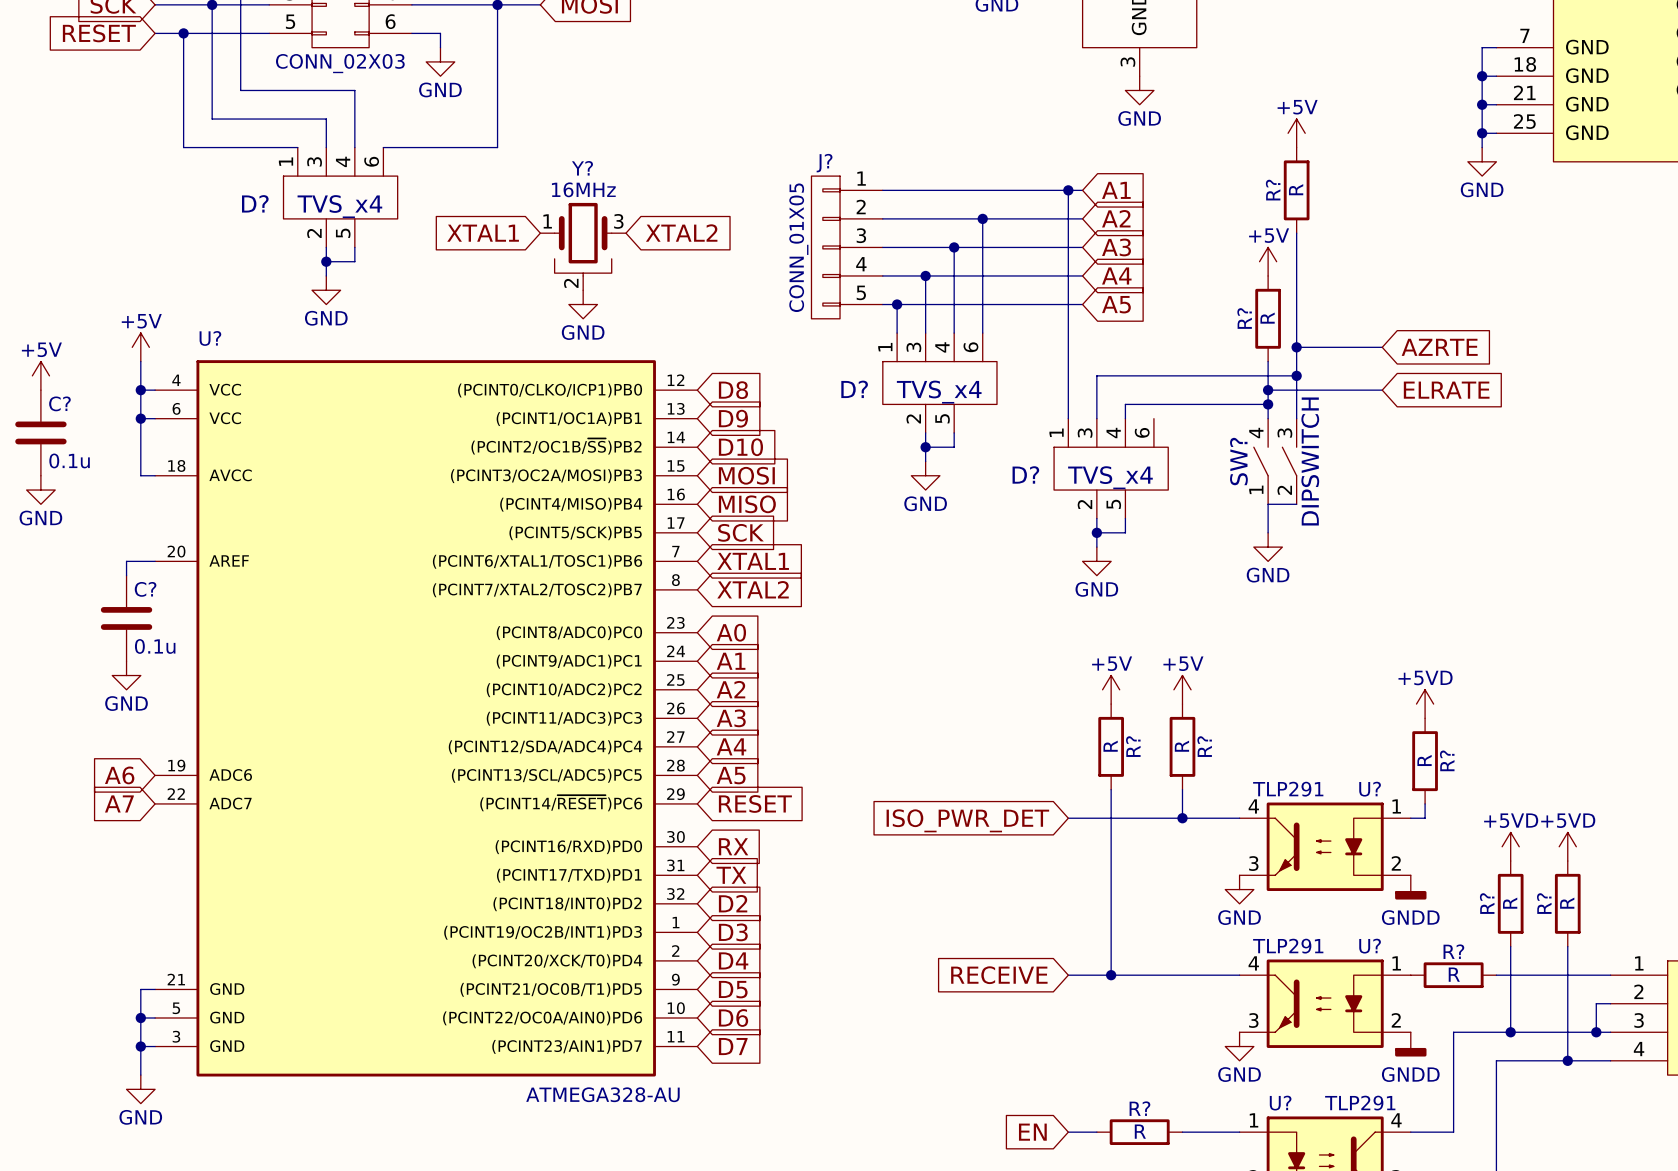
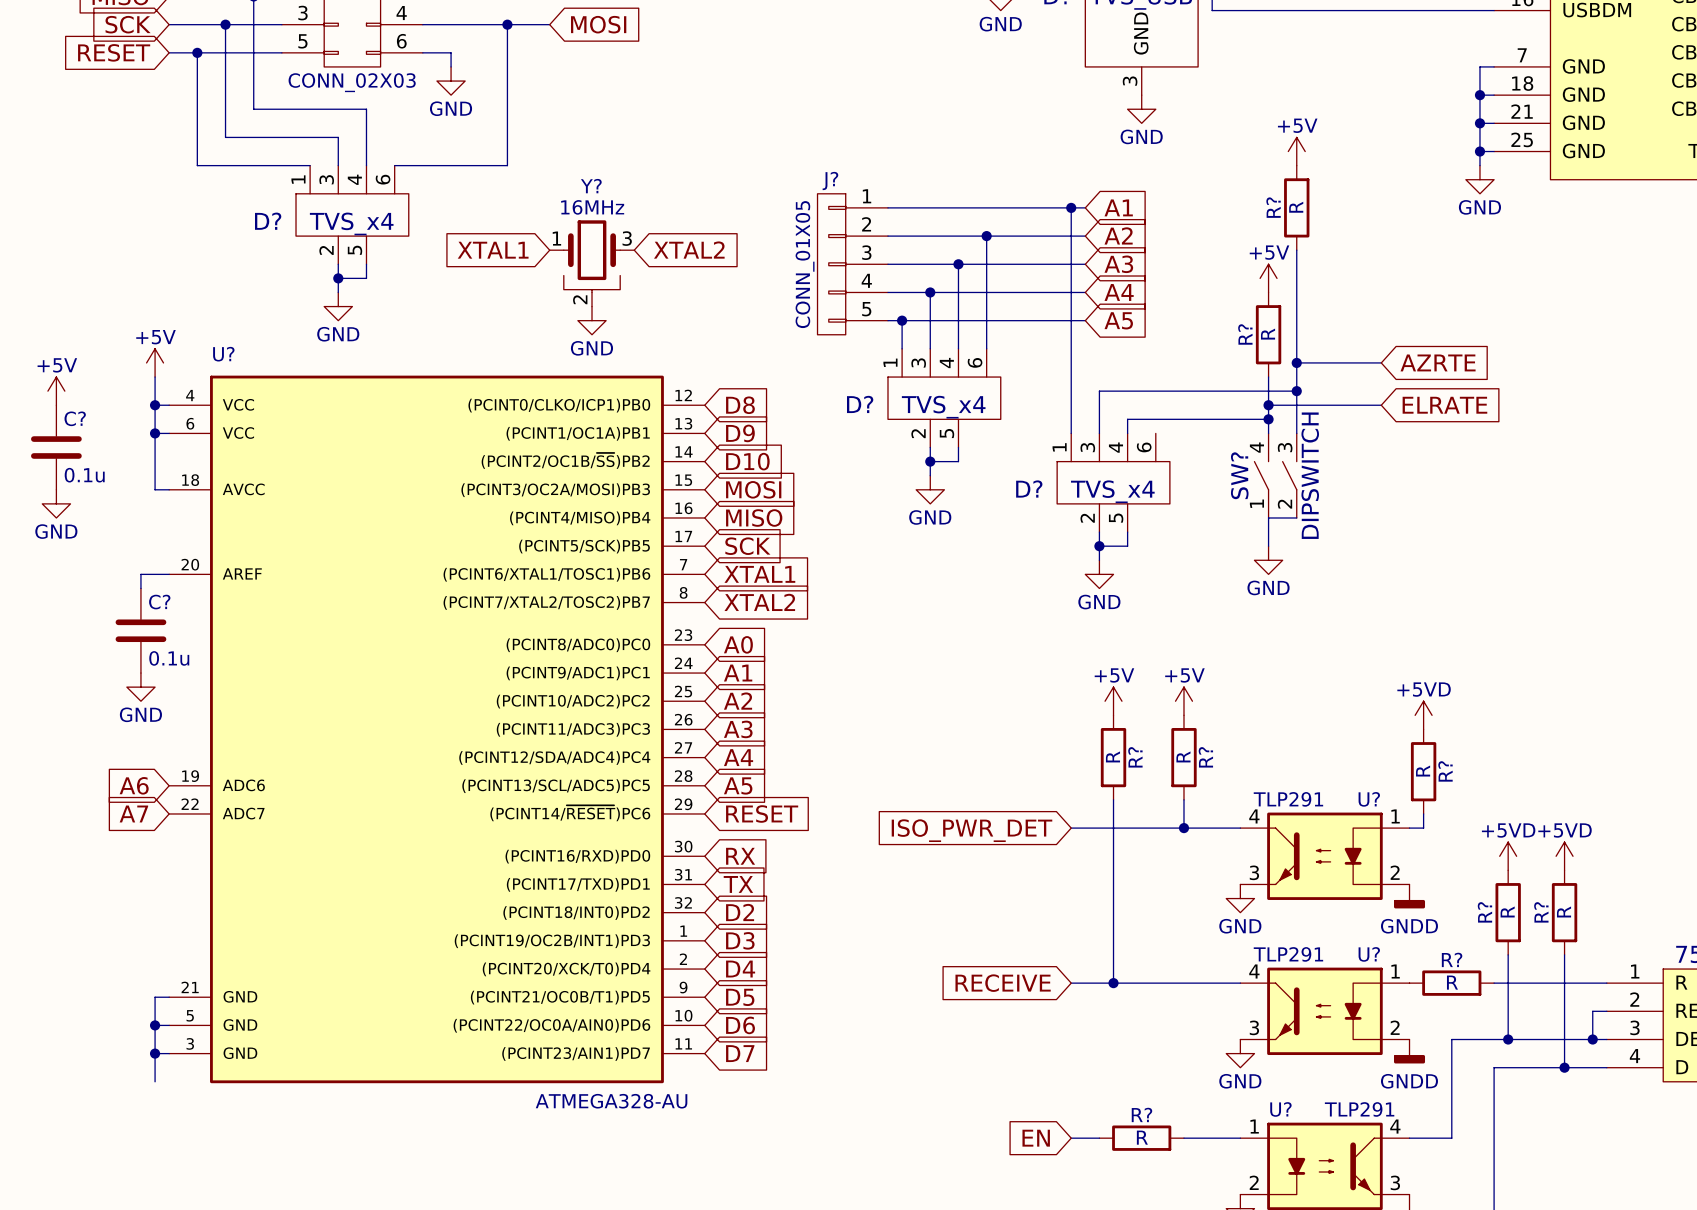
power symbol: GND (140, 1089) -> none

